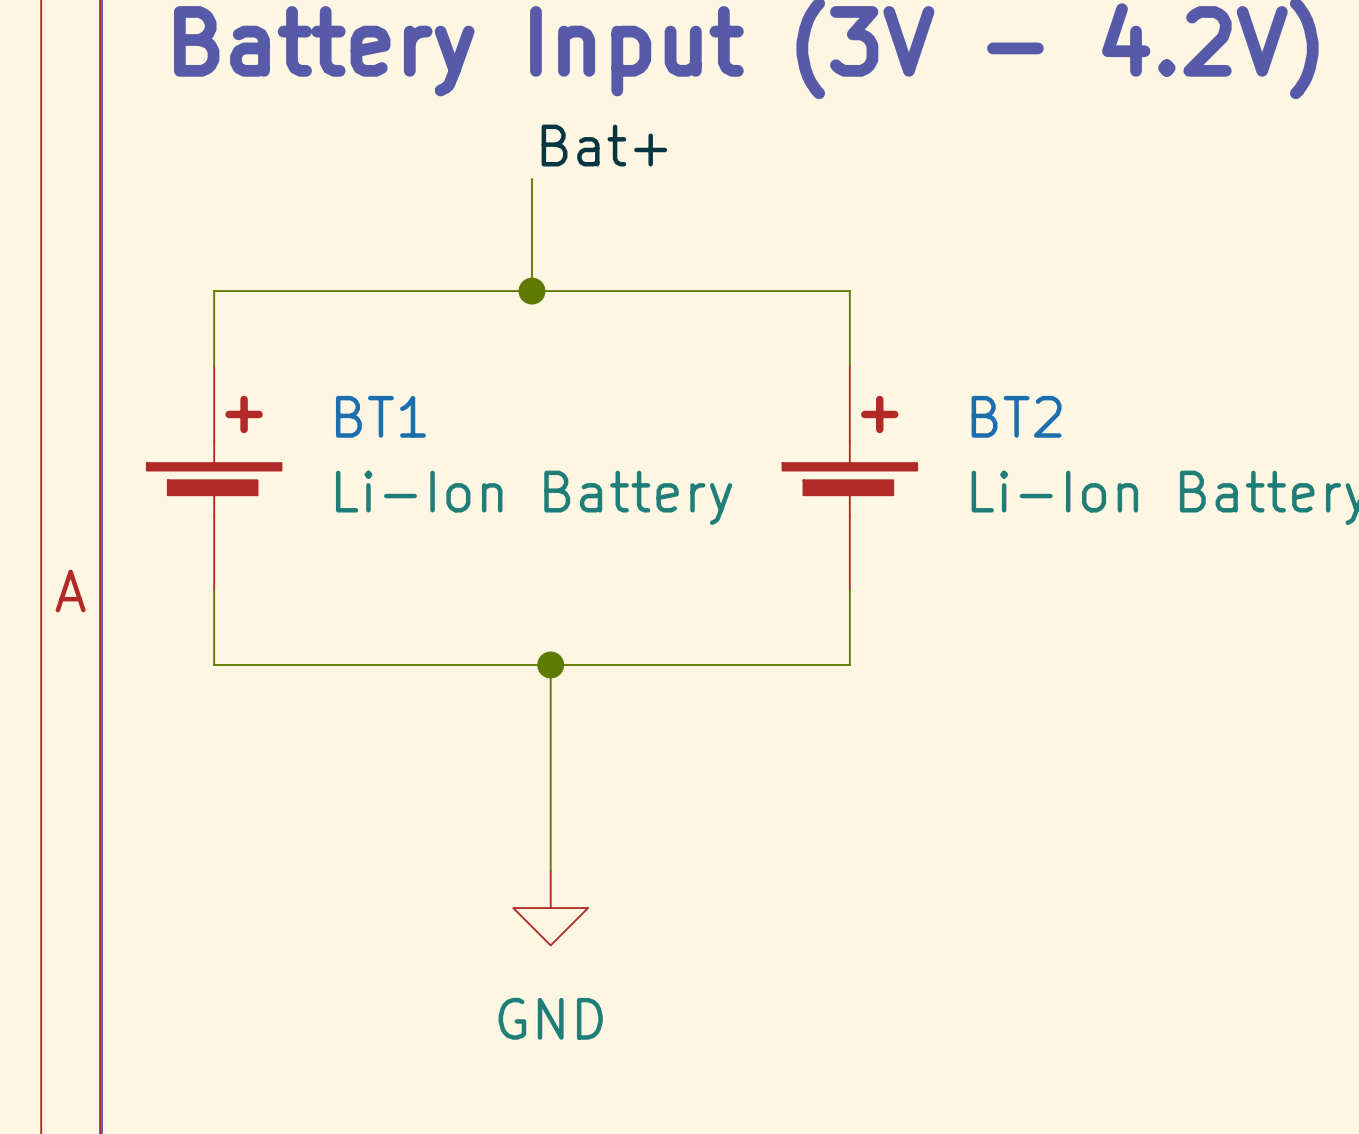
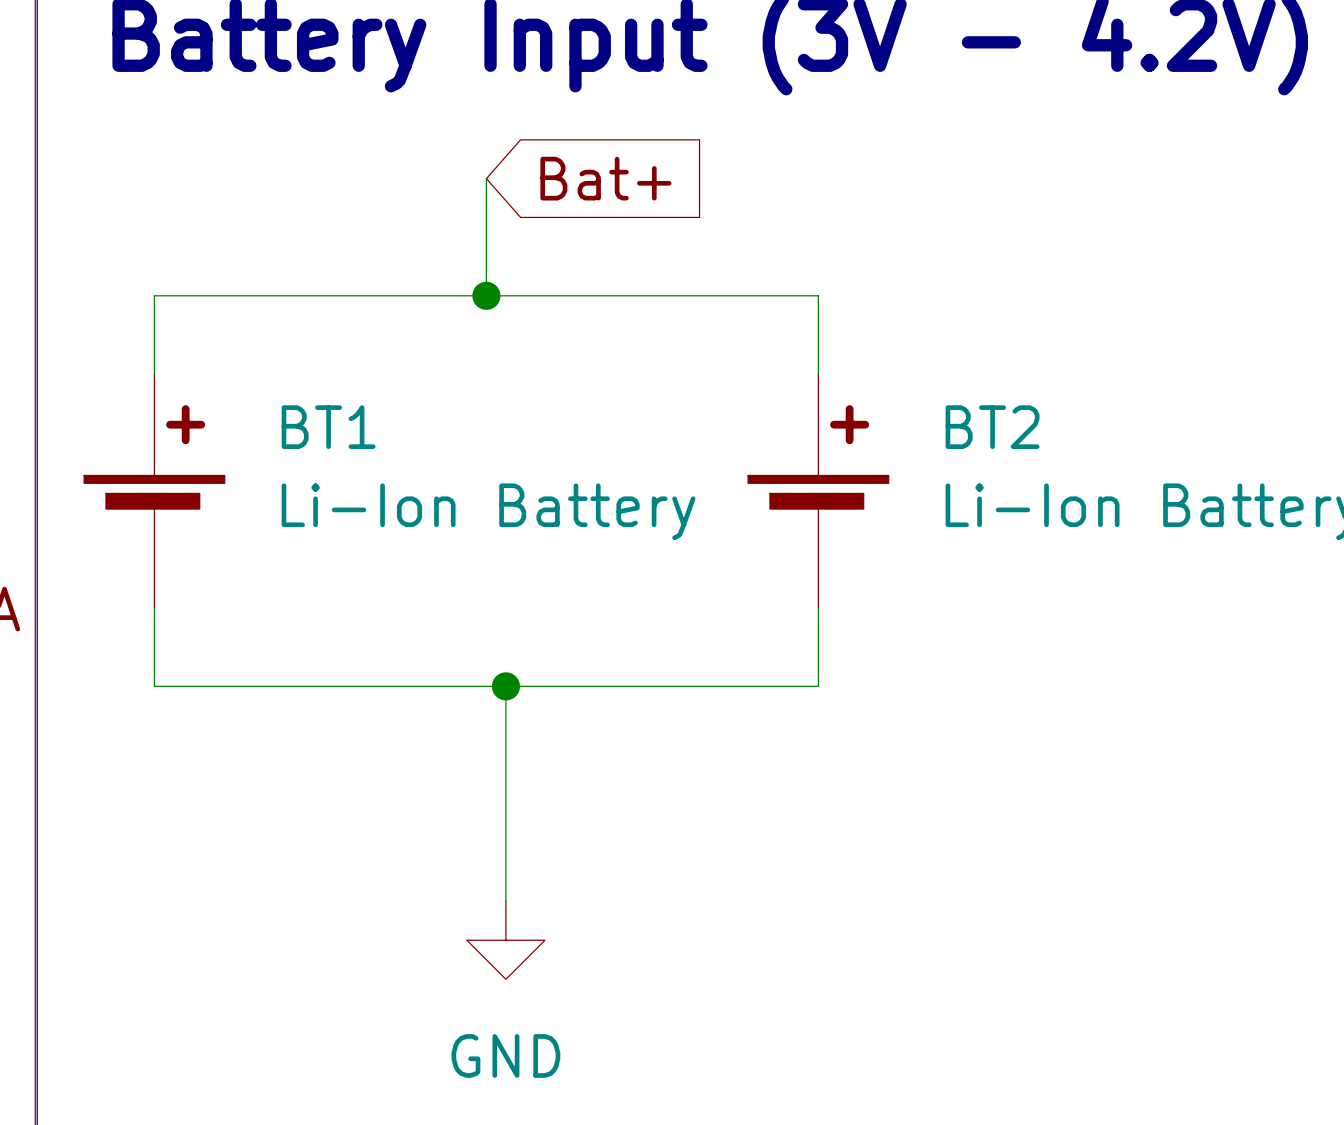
label: Bat+ (604, 145) -> none
global label: none -> Bat+ (605, 178)

